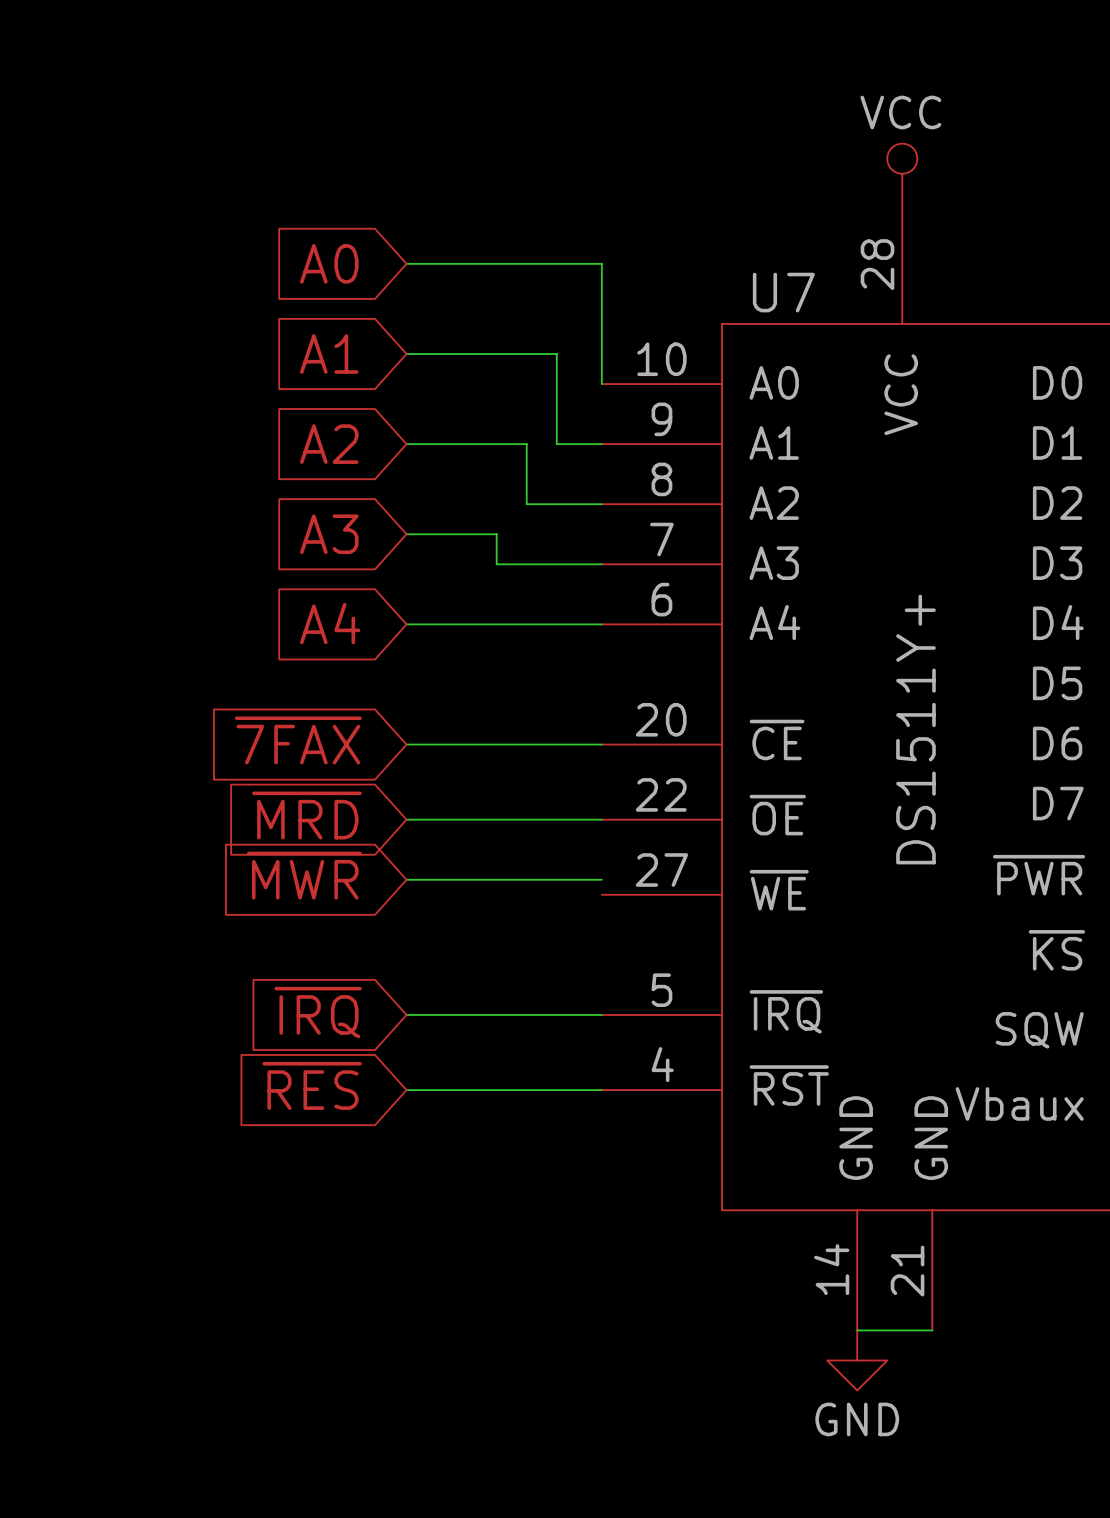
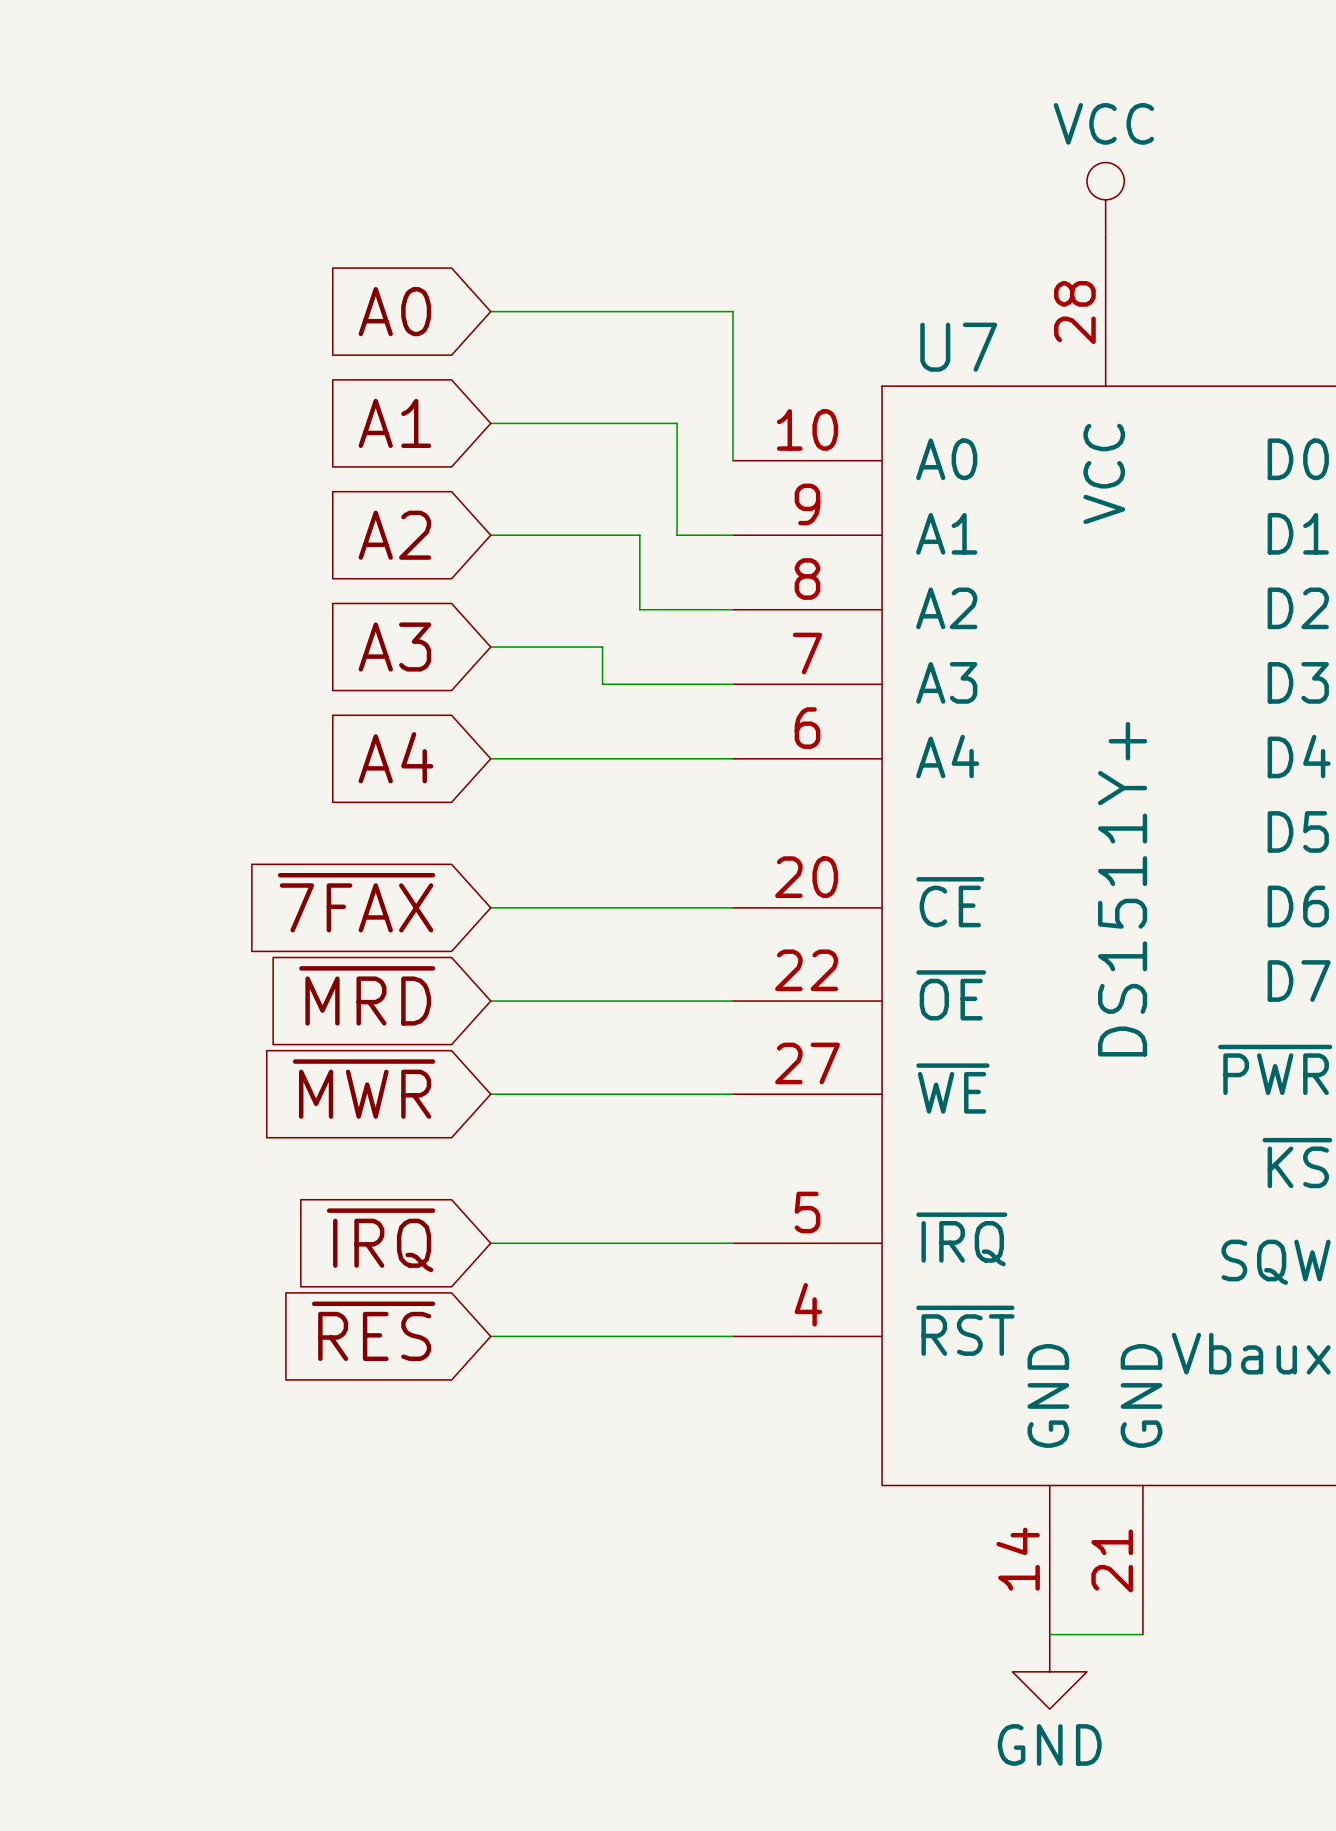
global label position: ~{MWR} (304, 875) -> ~{MWR} (364, 1089)
wire: (406, 879) (601, 879) -> (490, 1094) (732, 1094)

